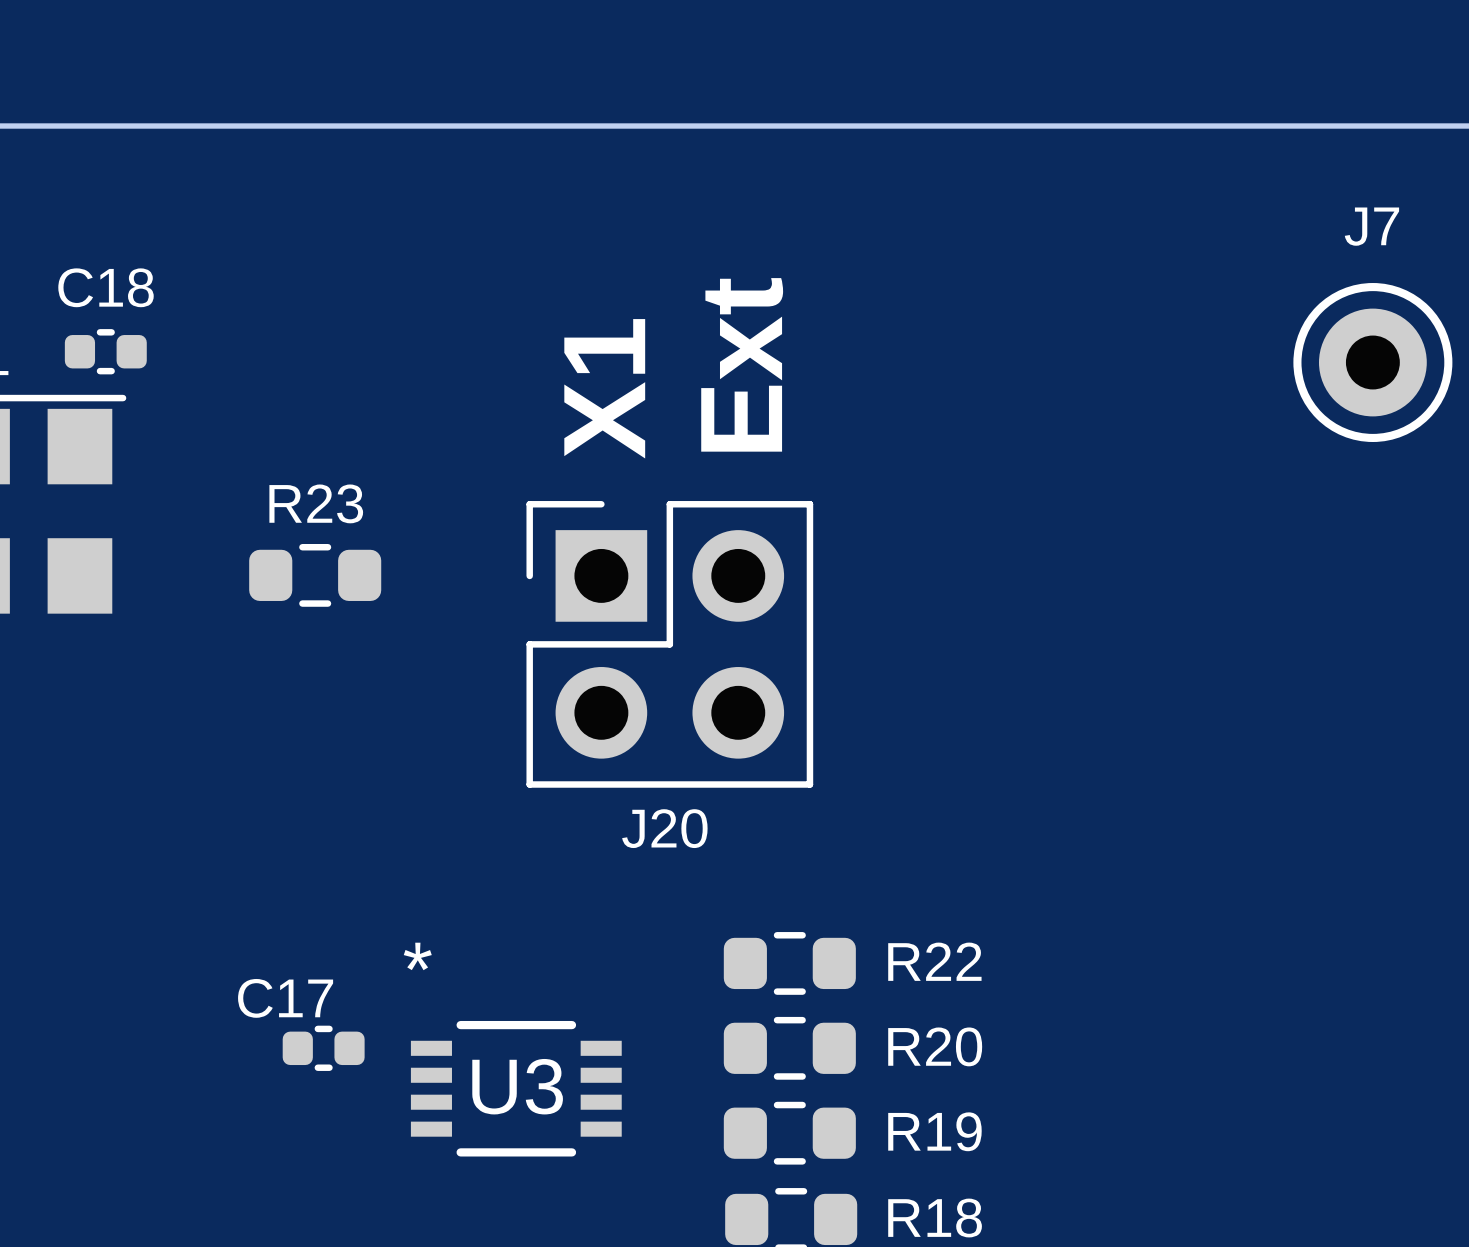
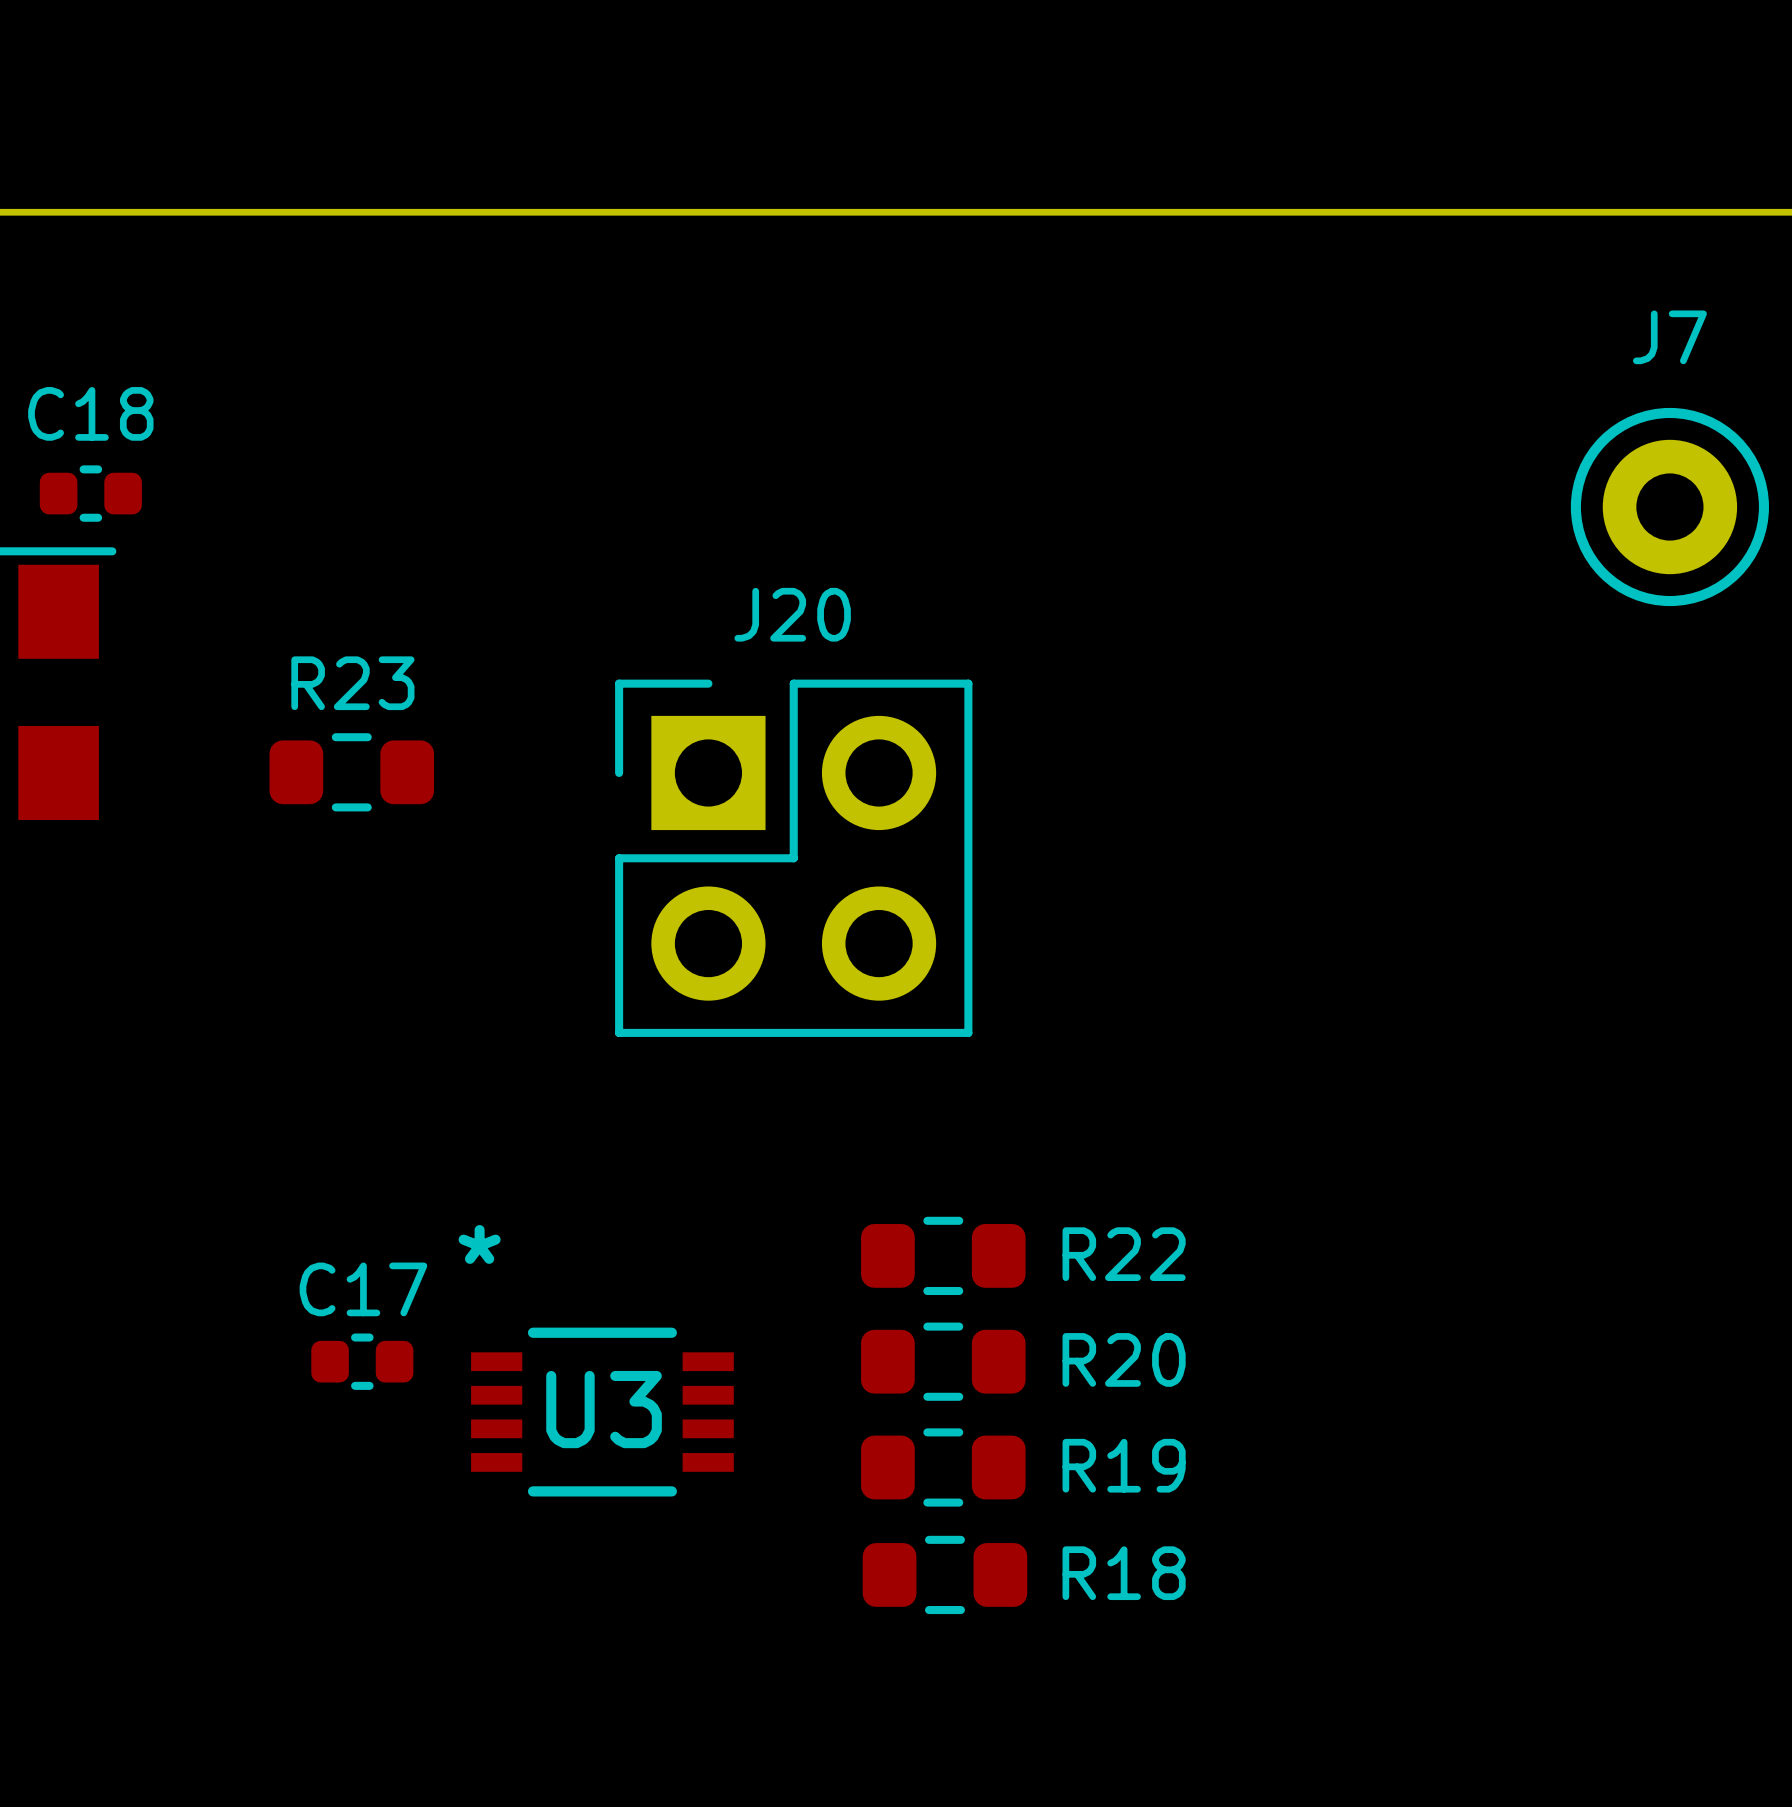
text: Ext (742, 364) -> none
text: X1 (604, 388) -> none
J20 name position: J20 (664, 828) -> J20 (792, 614)
C17 name position: C17 (285, 998) -> C17 (363, 1289)

